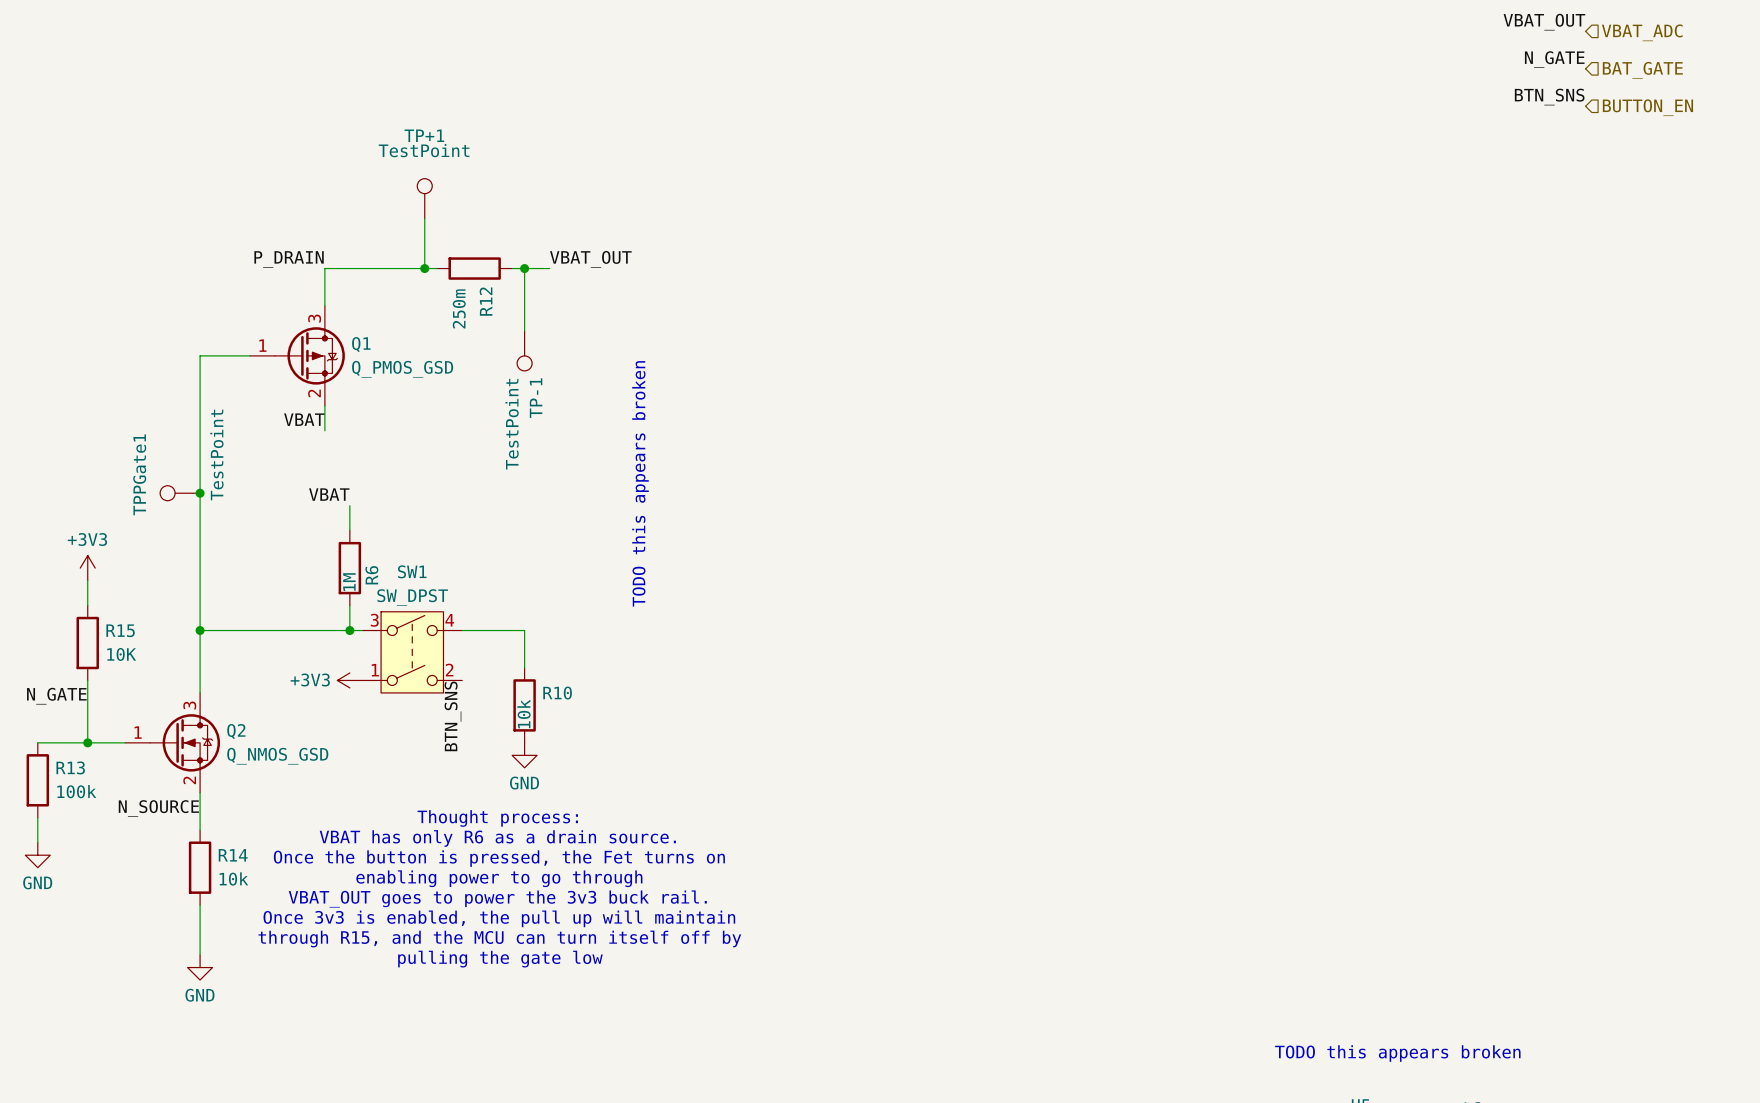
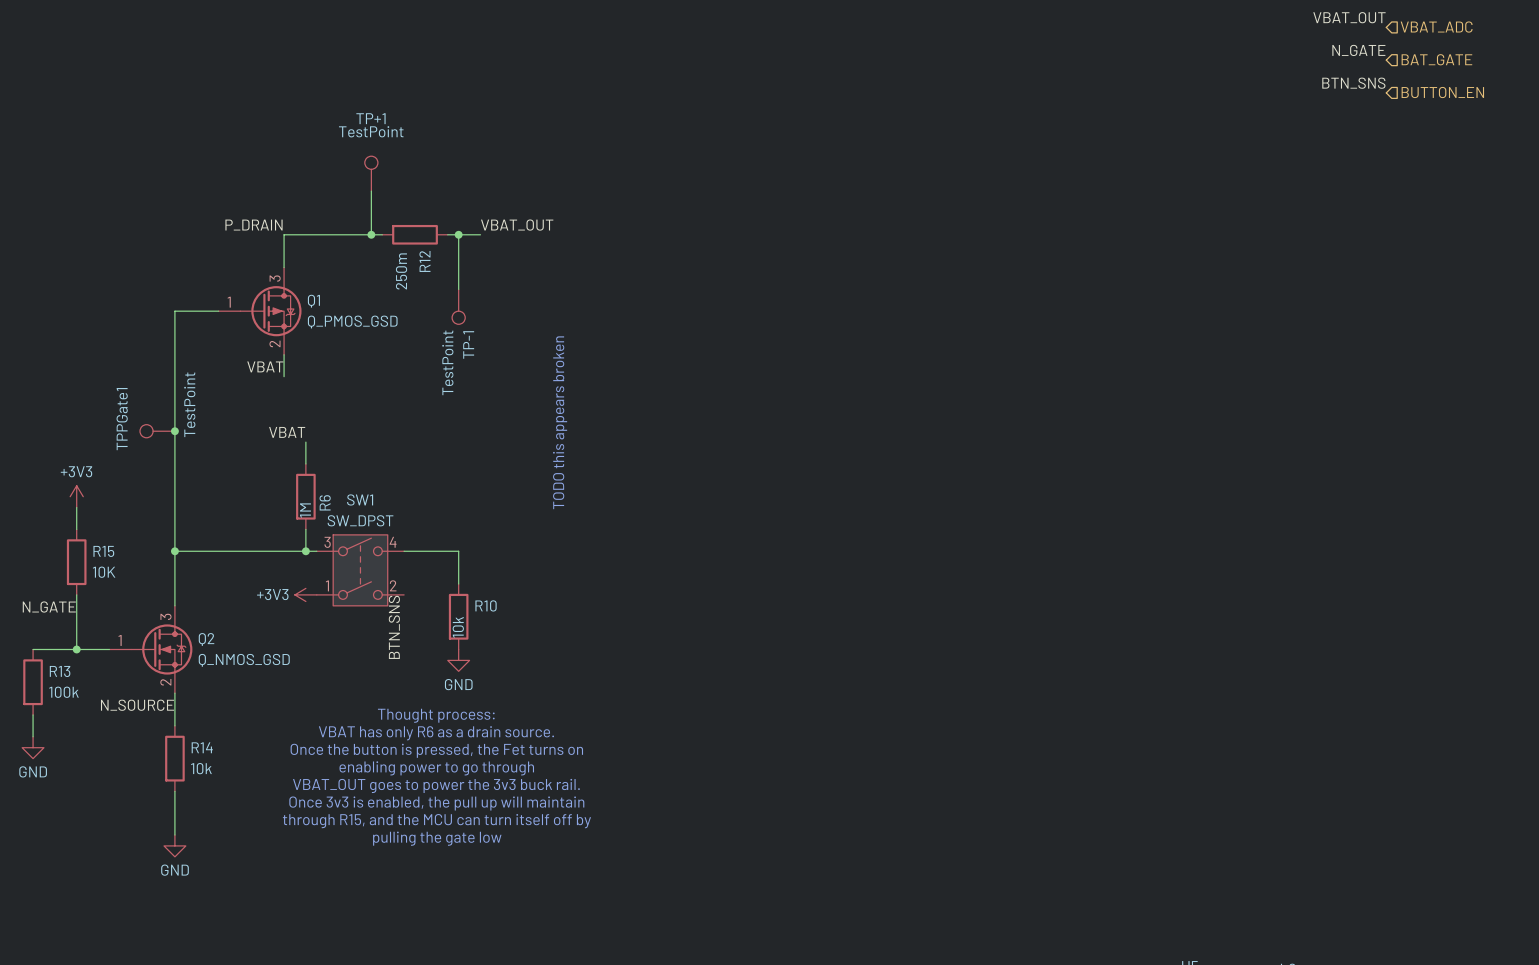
text: TODO this appears broken (1397, 1053) -> none

